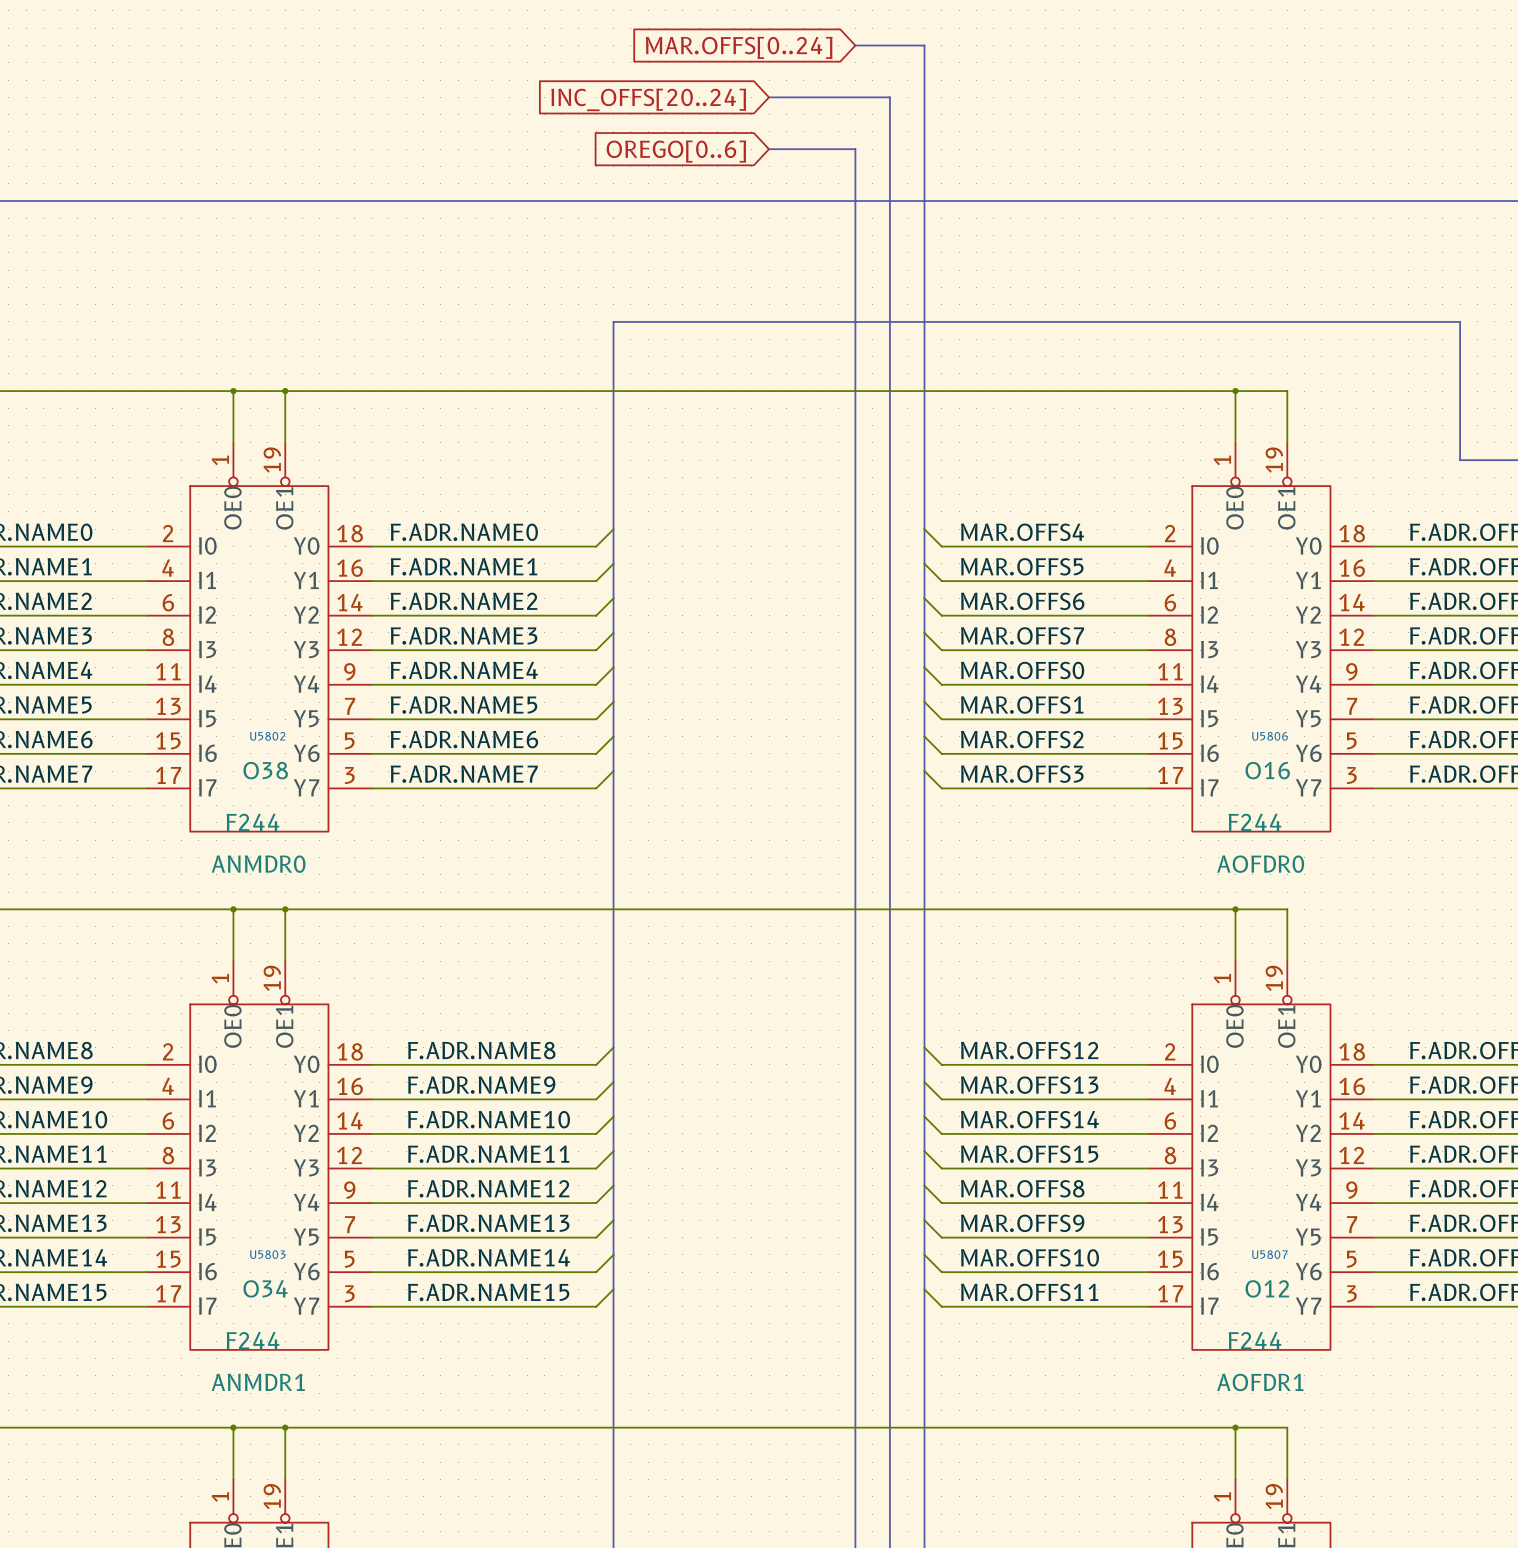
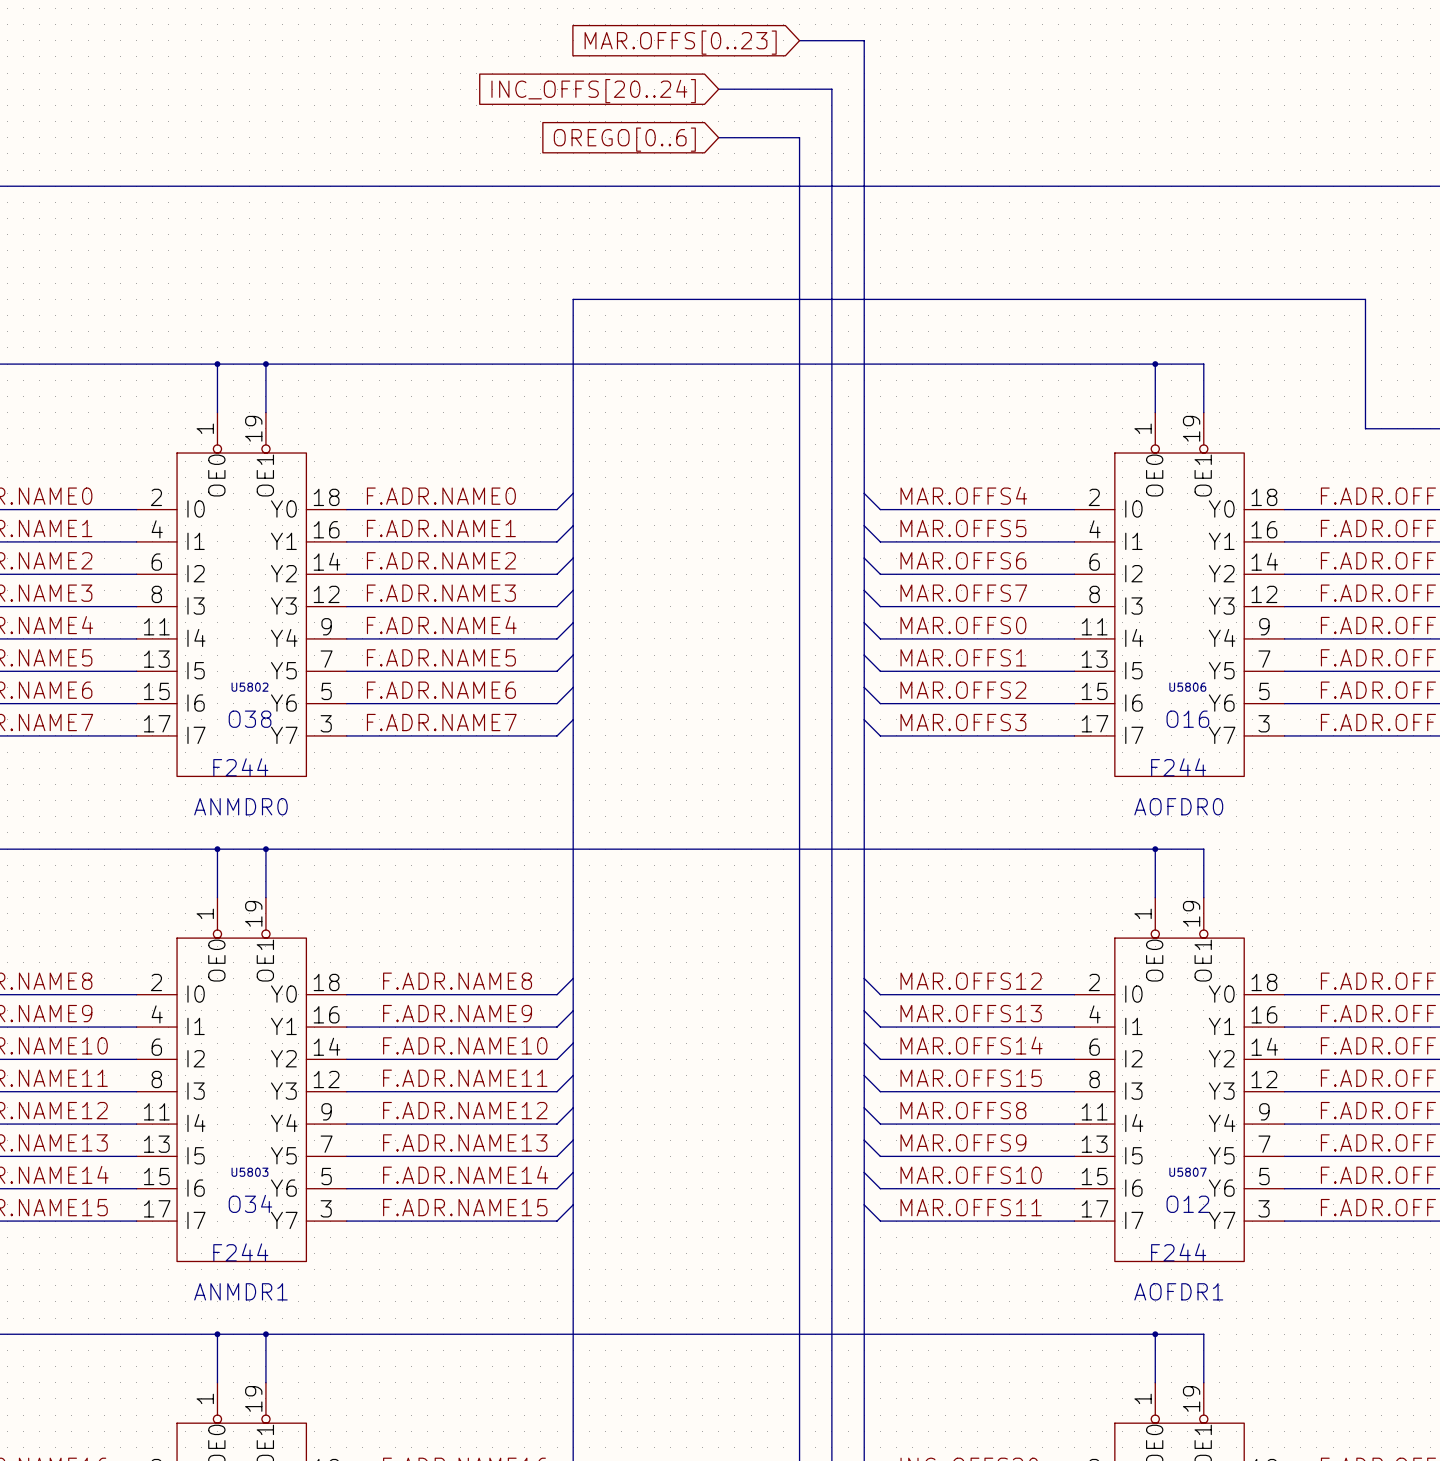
global label: MAR.OFFS[0..24] (739, 47) -> MAR.OFFS[0..23] (680, 42)

